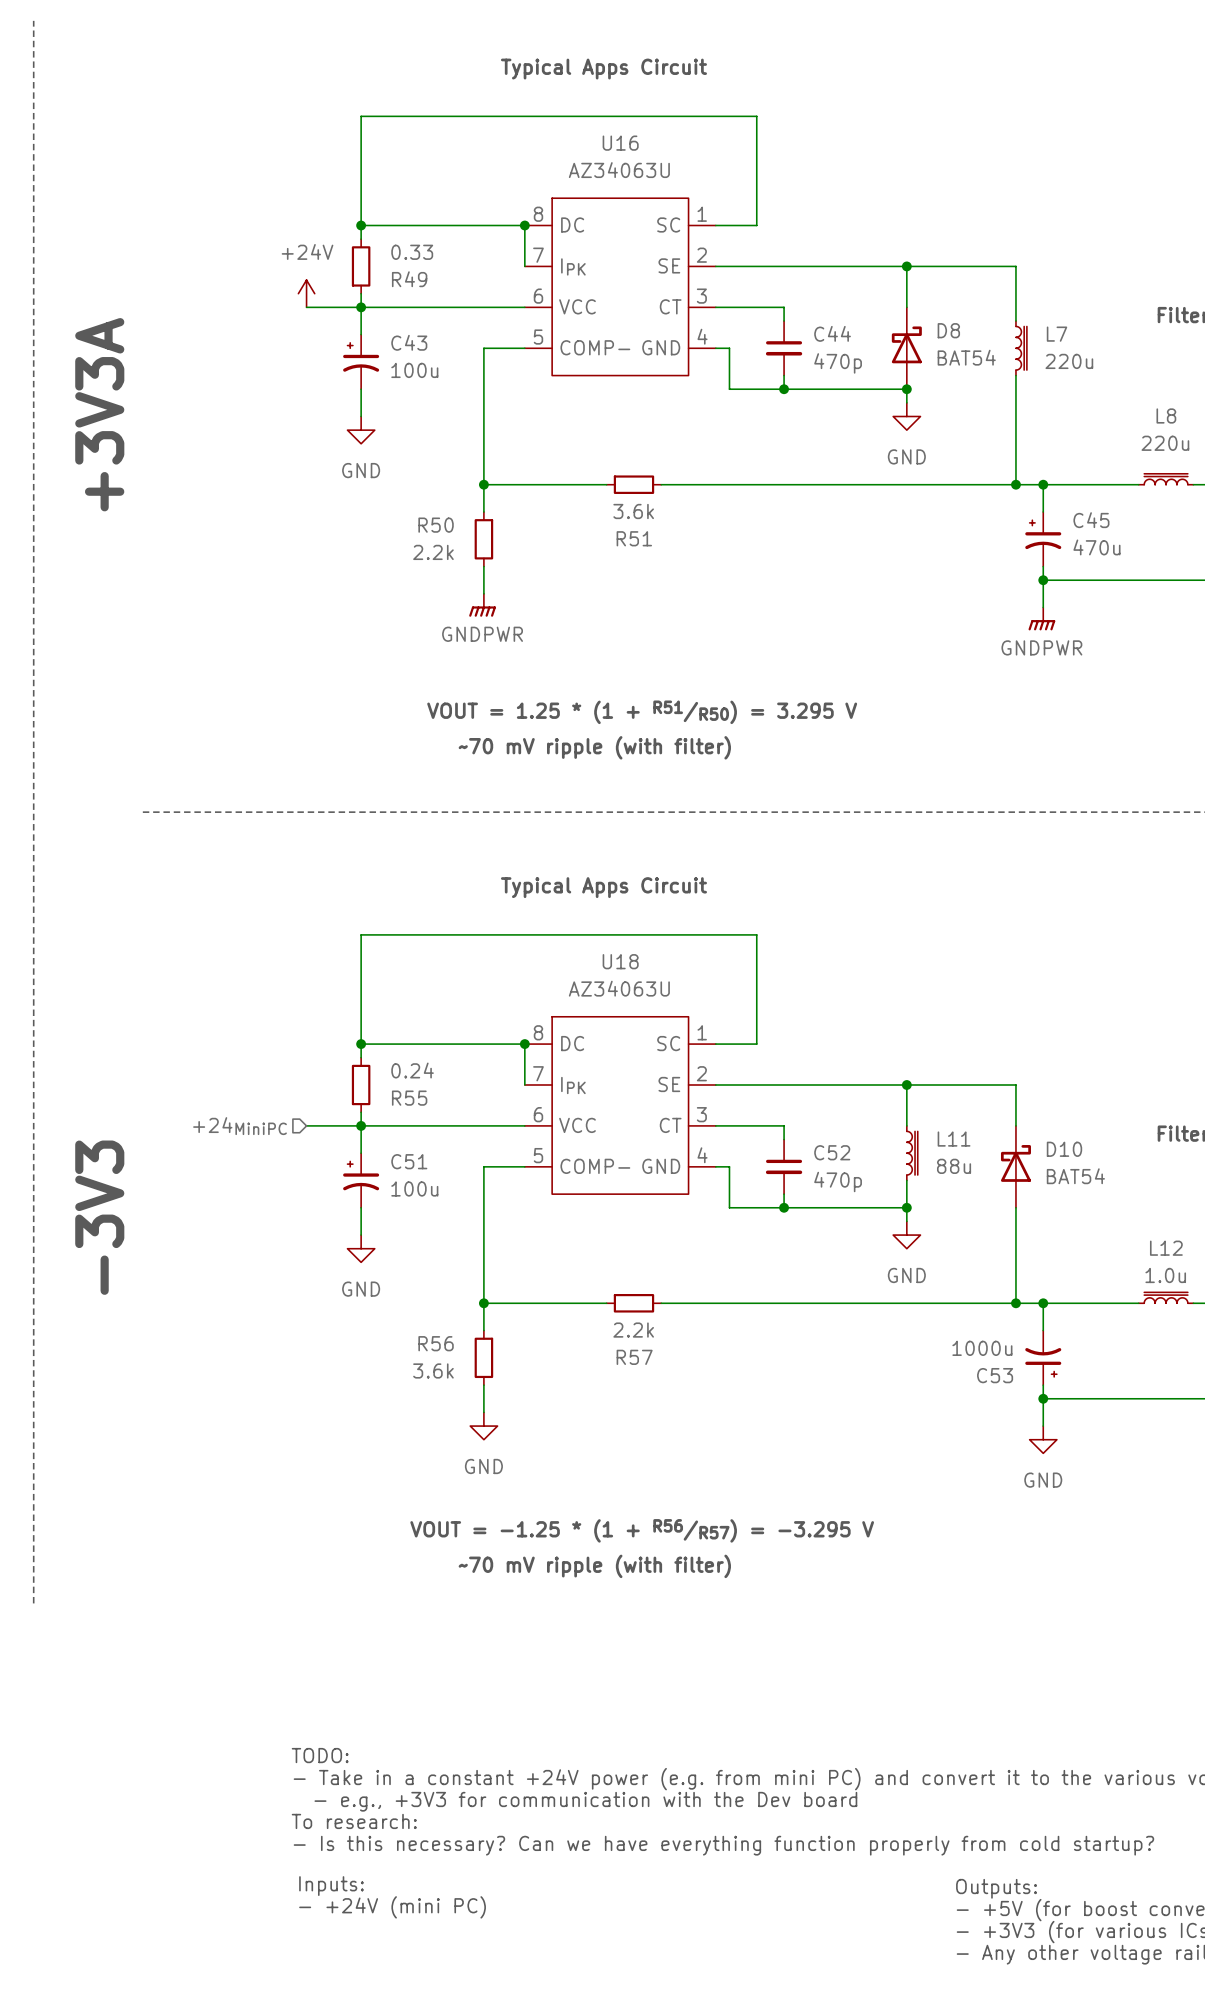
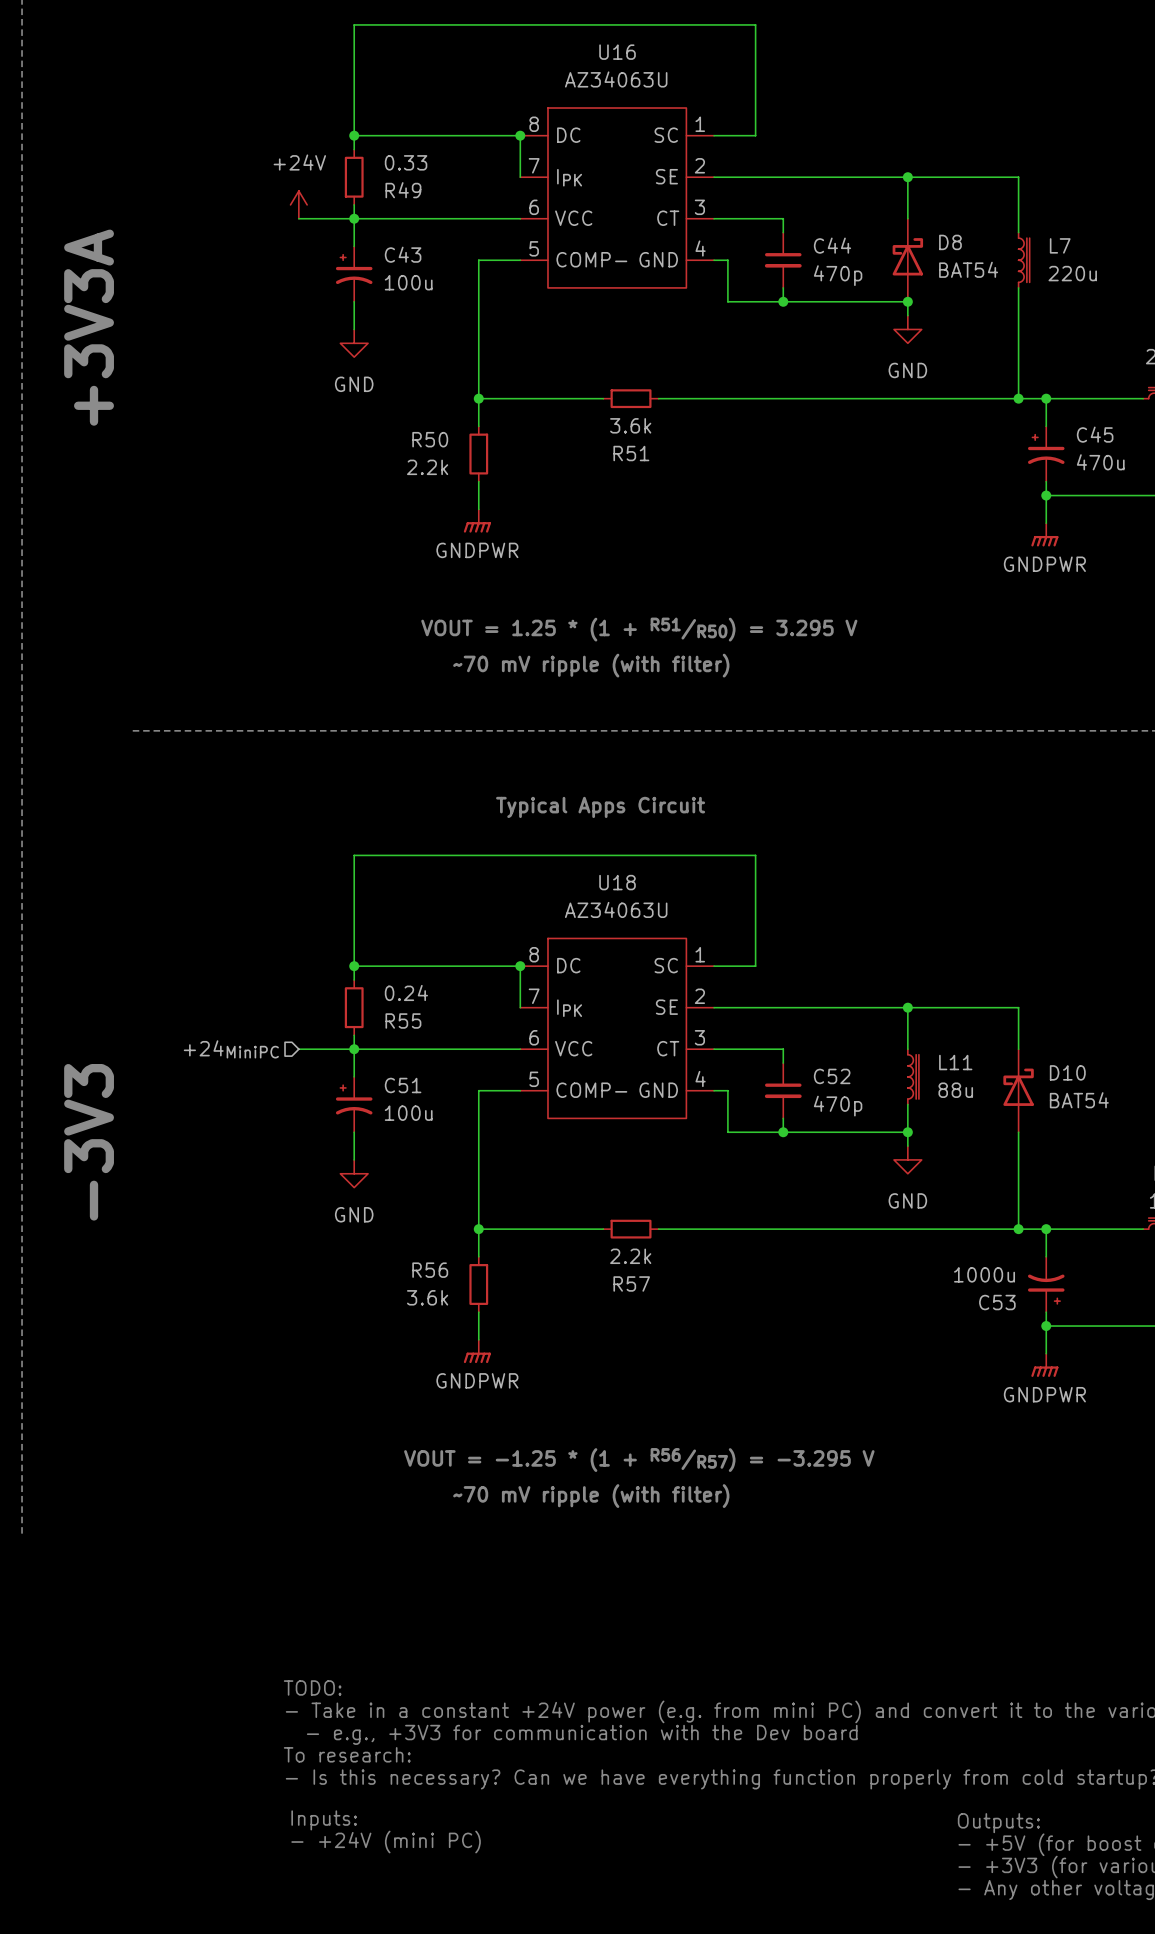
power symbol: GND (483, 1426) -> GNDPWR (477, 1351)
power symbol: GND (1043, 1439) -> GNDPWR (1044, 1365)

